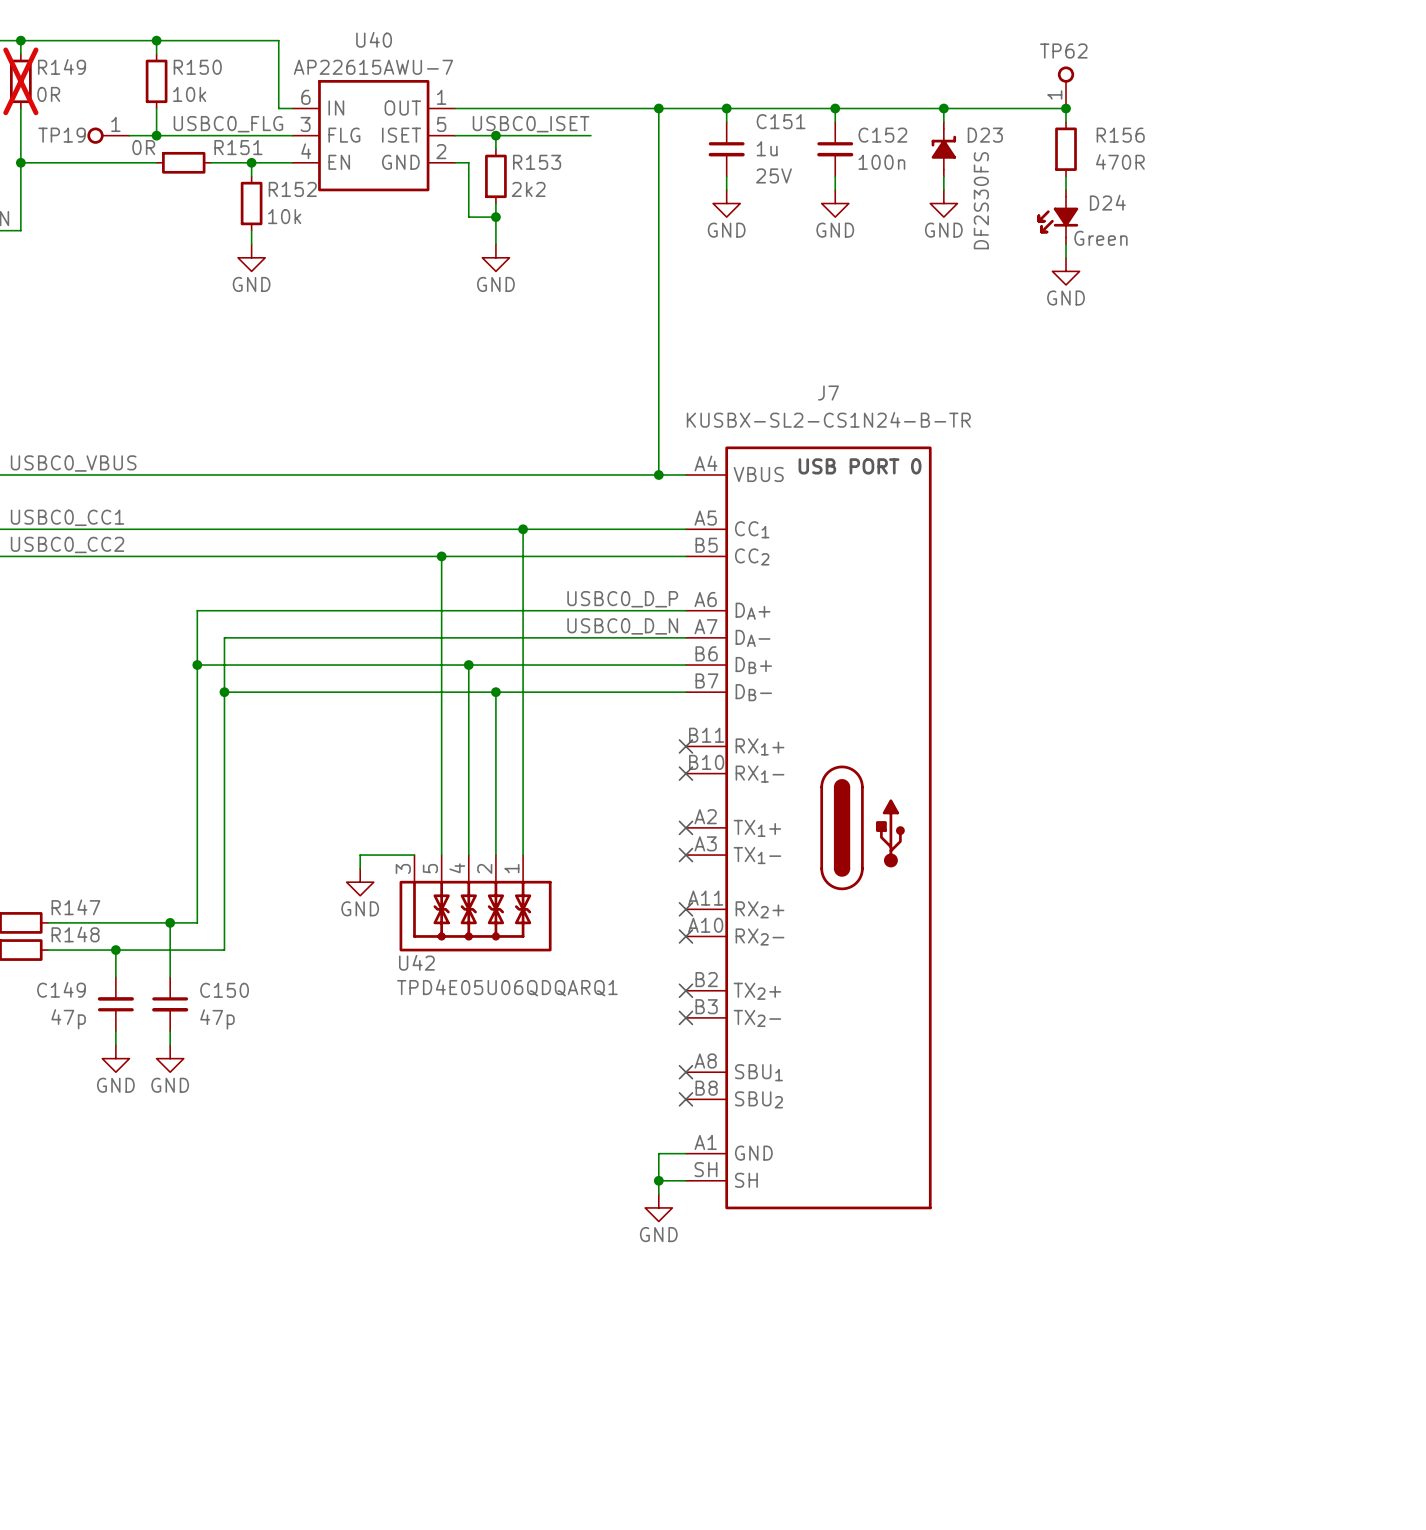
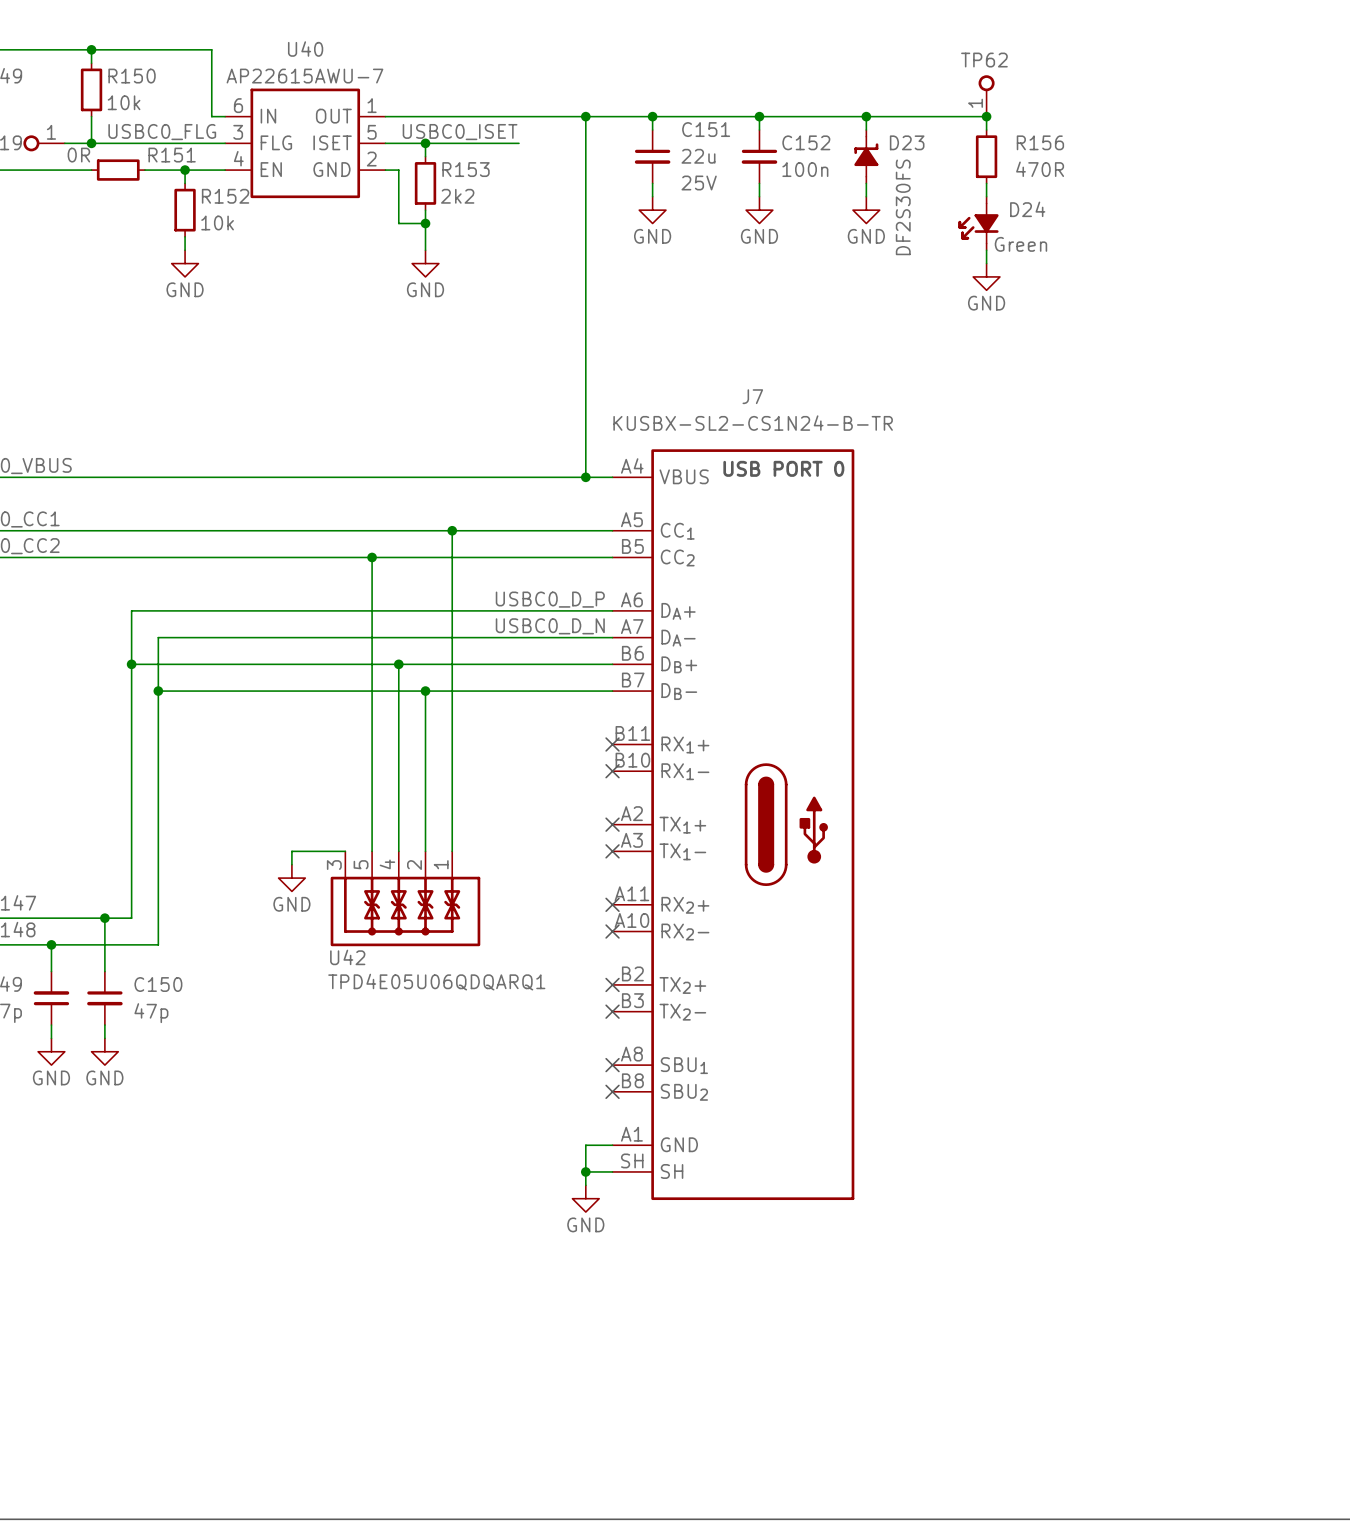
C151 text: 1u (767, 148) -> 22u (698, 156)

